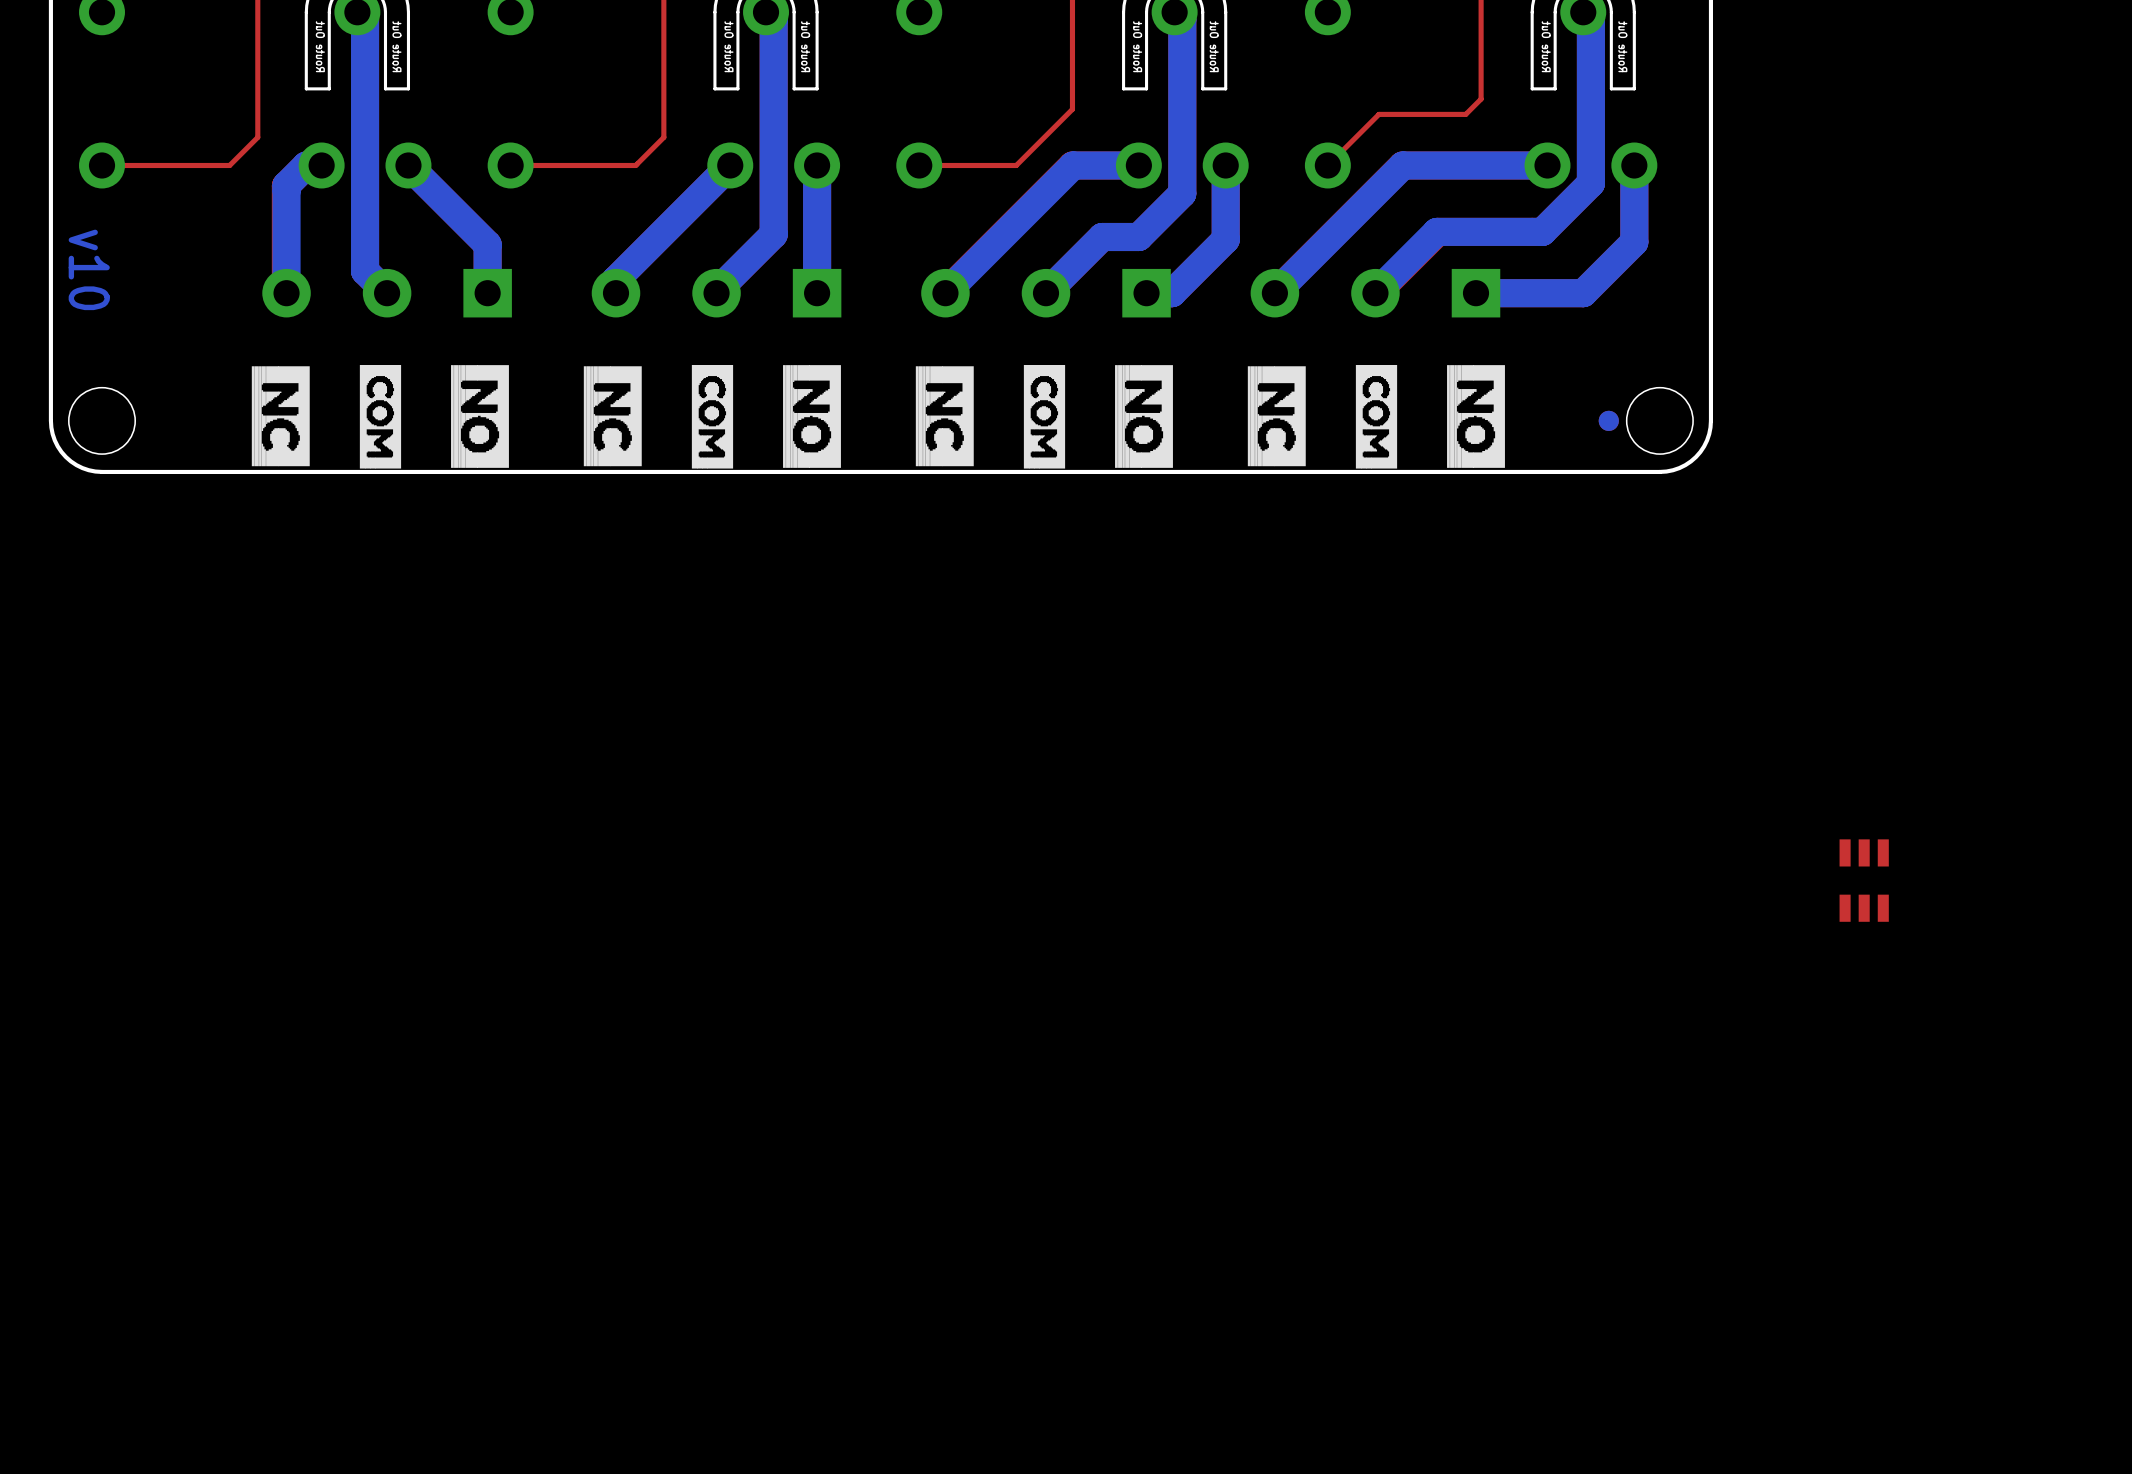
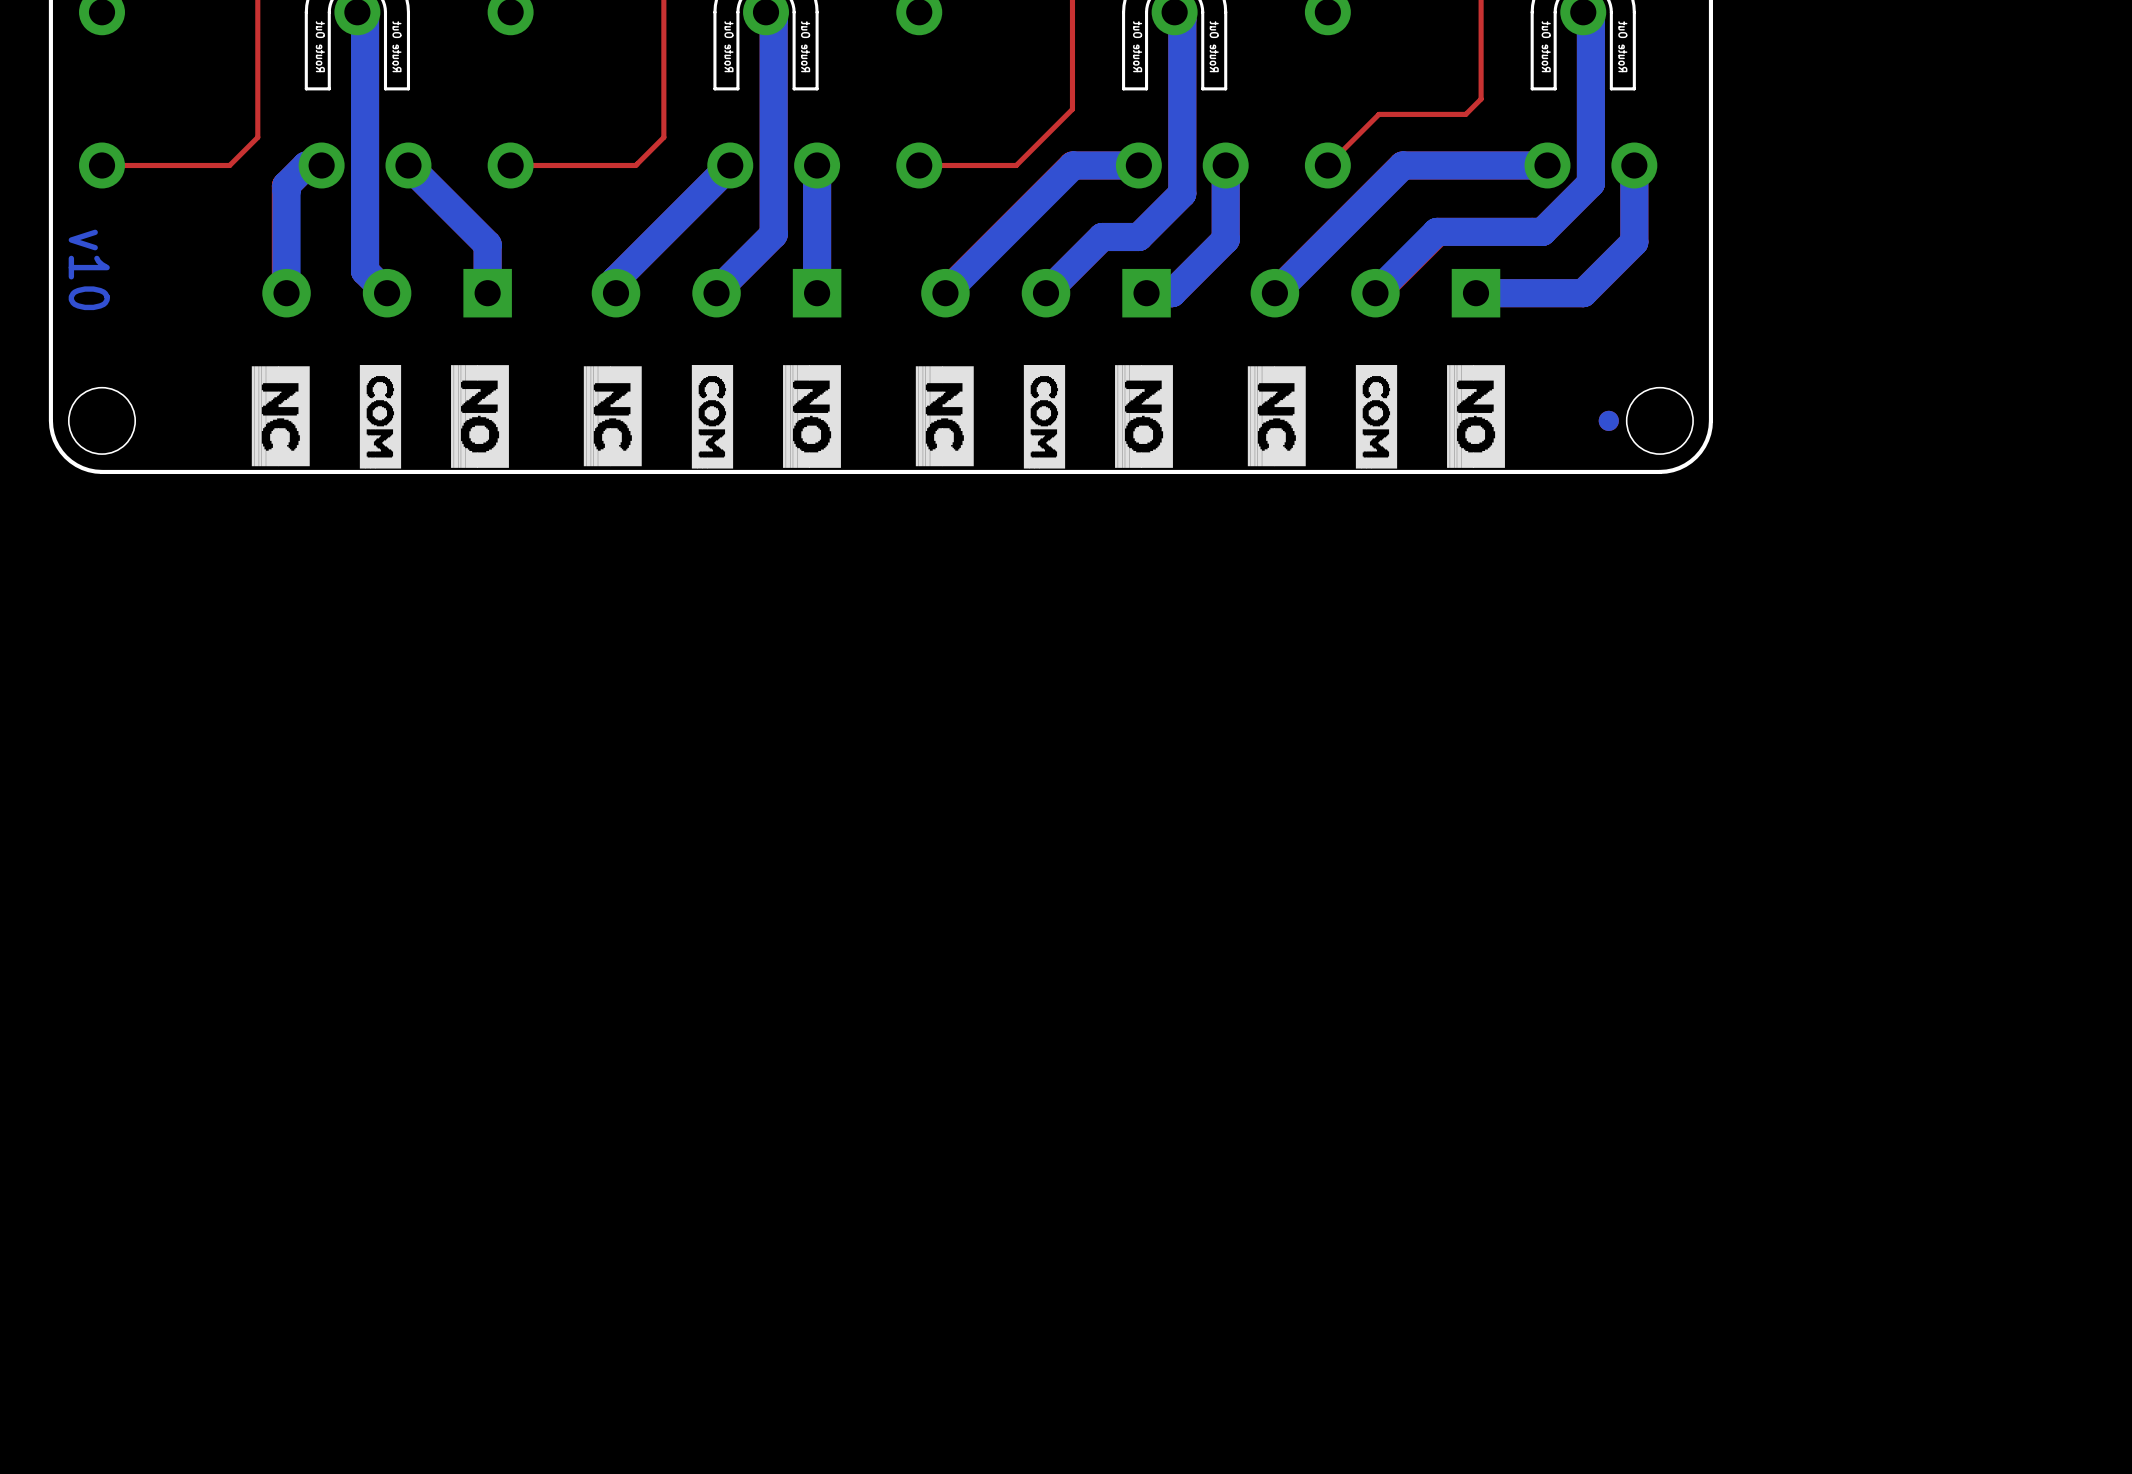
part: (1864, 880) -> none

